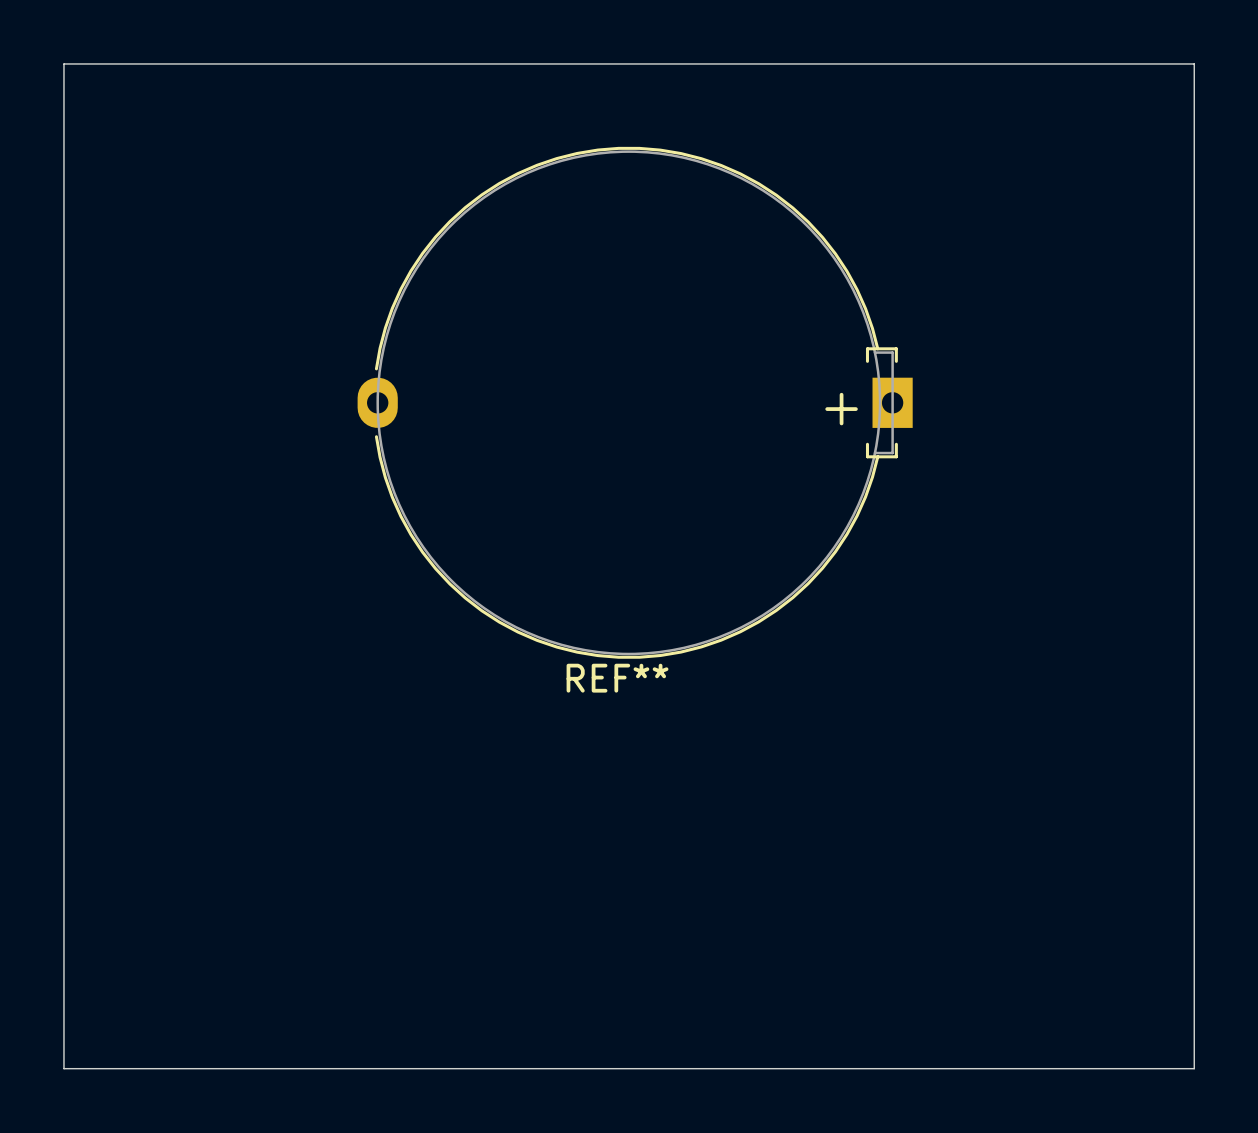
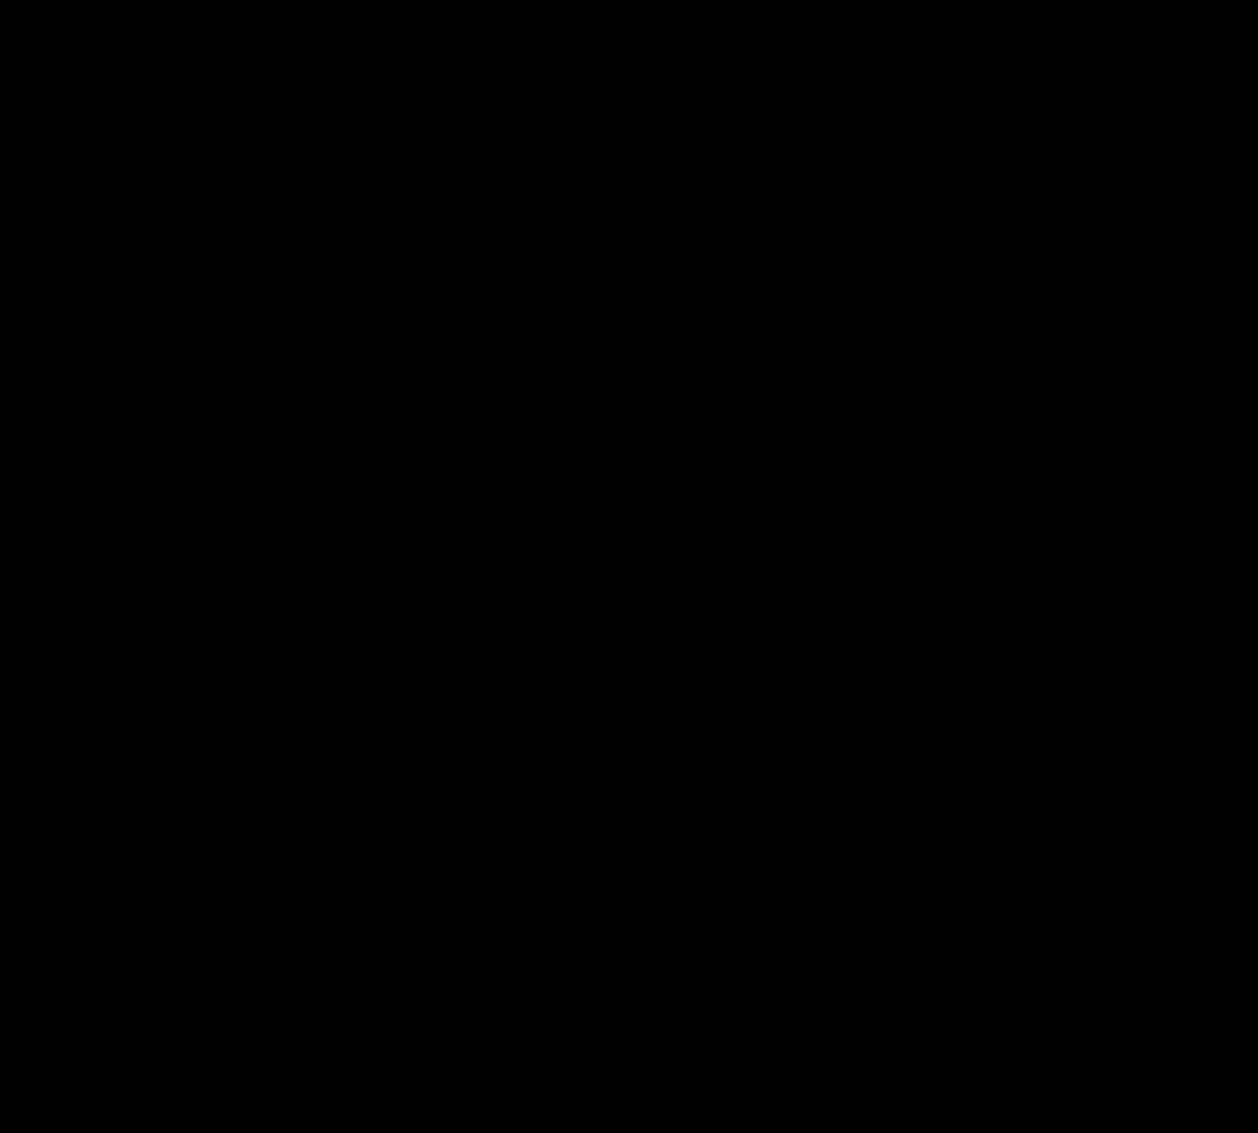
board edge: (1194, 63) (63, 63) (63, 1068) (1194, 1068) (1194, 63) -> none
REF**: (635, 402) -> none

